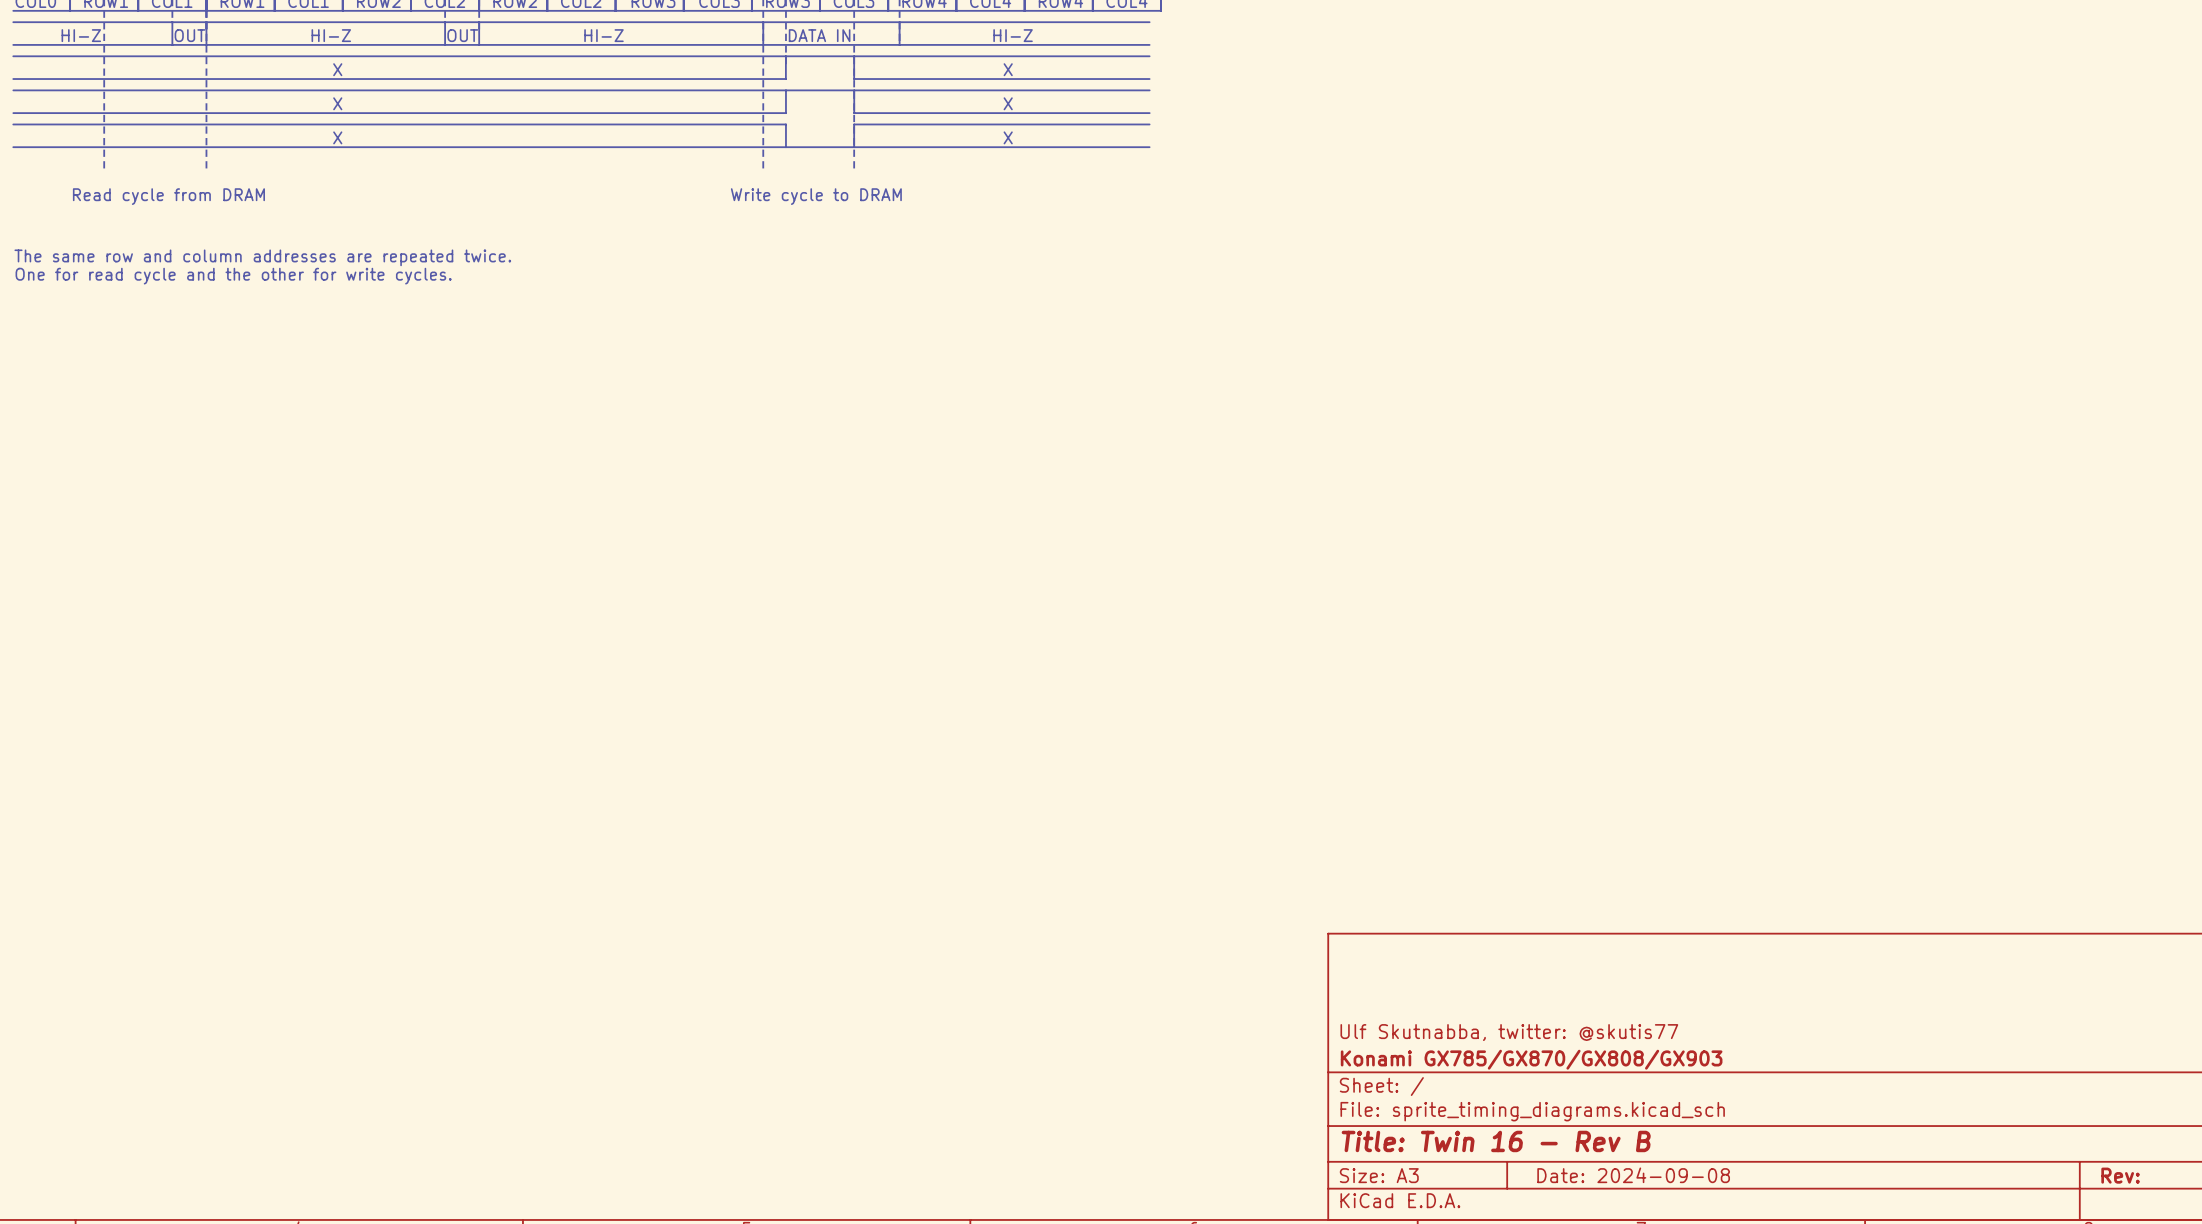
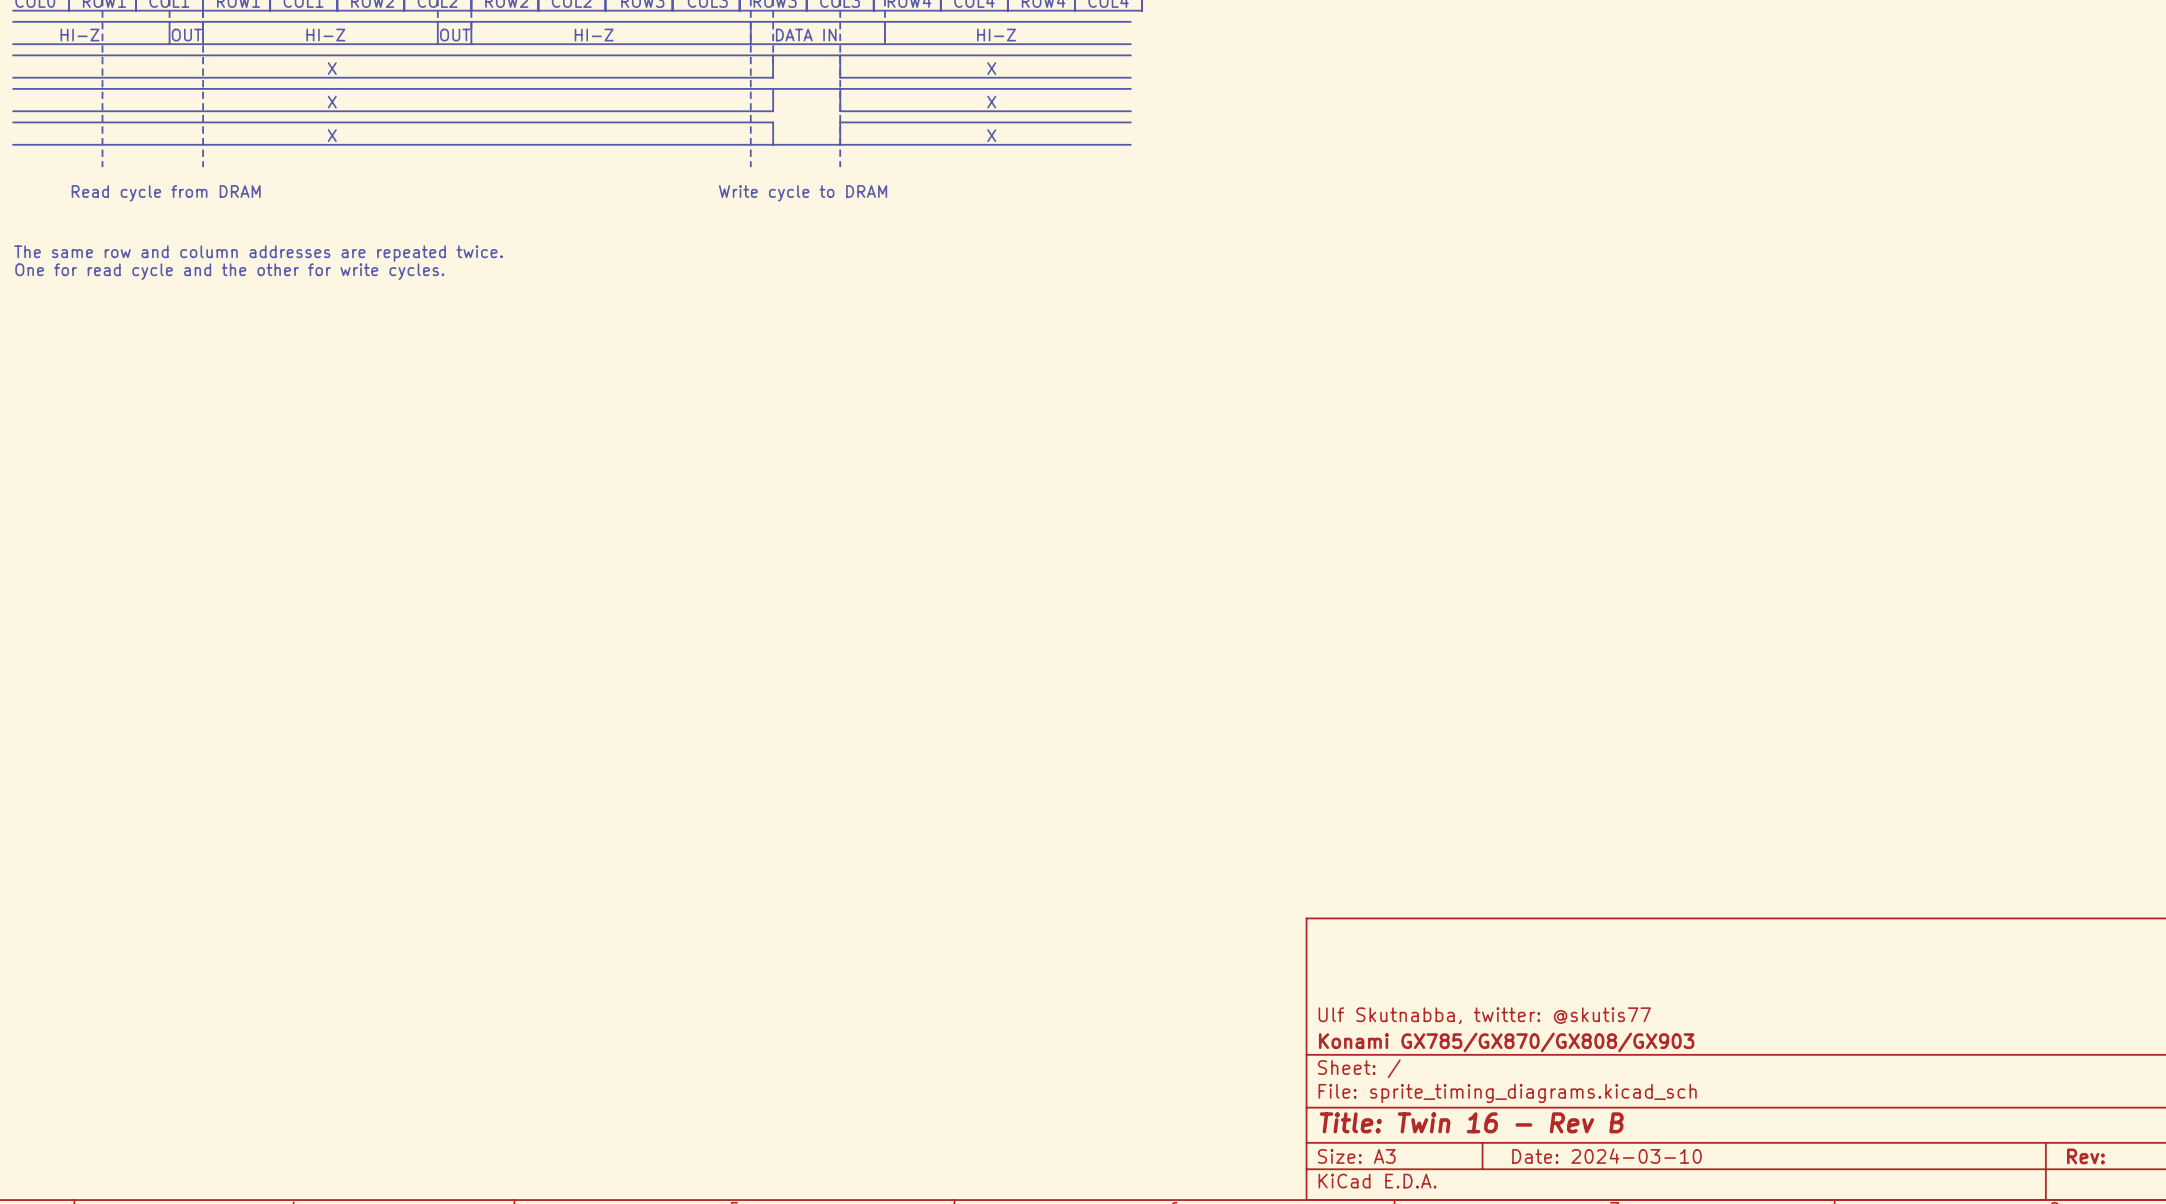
title block: Date: 2024-09-08 (1633, 1175) -> Date: 2024-03-10 (1606, 1156)

